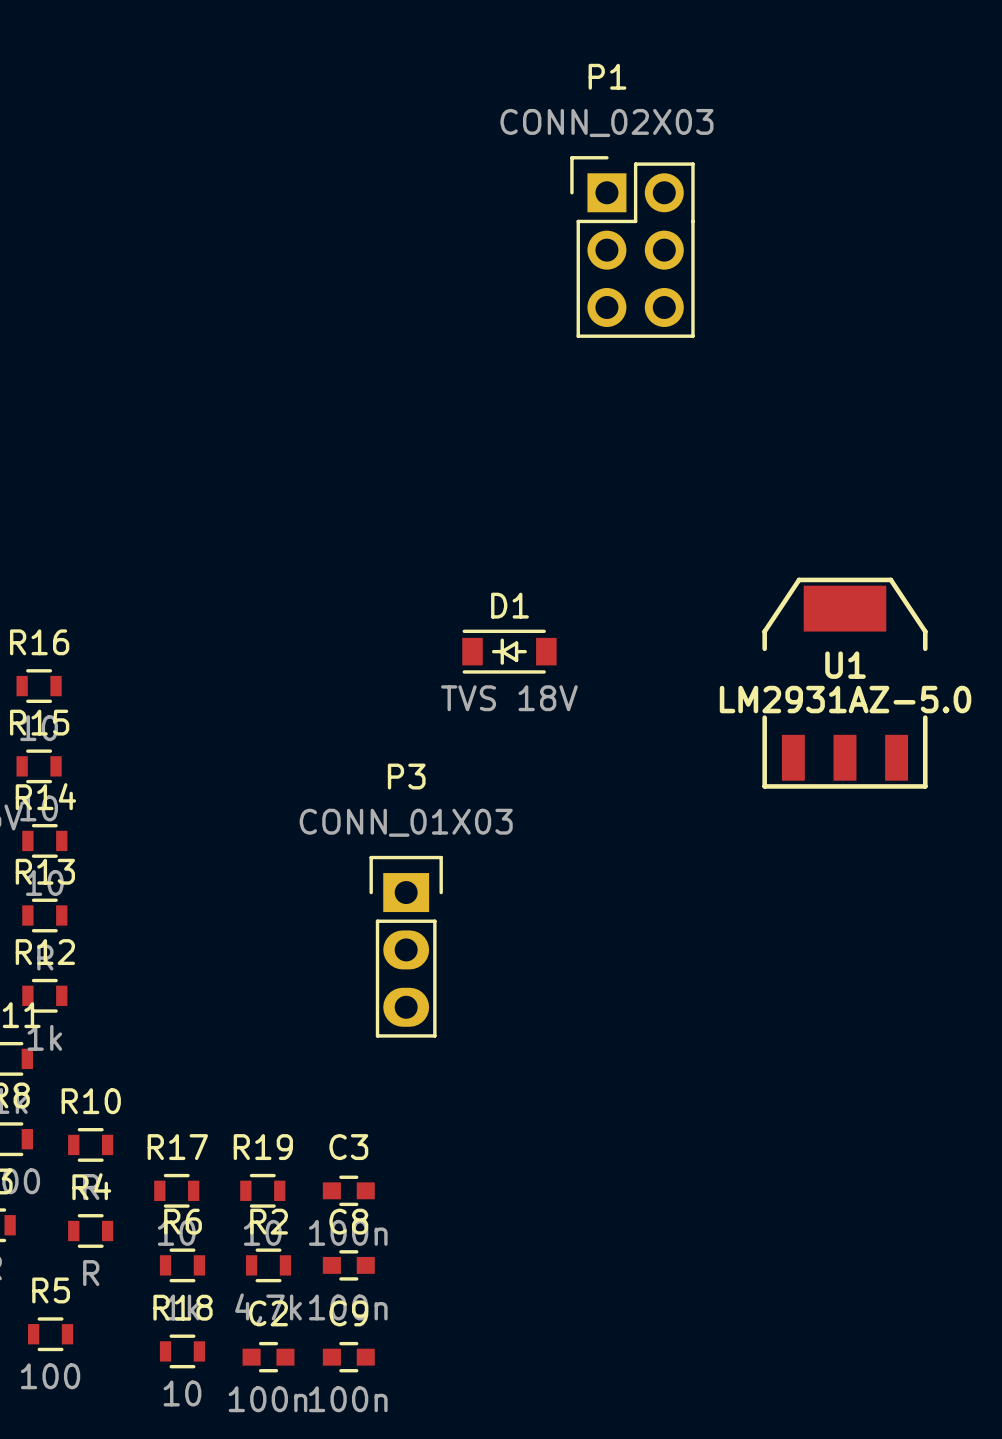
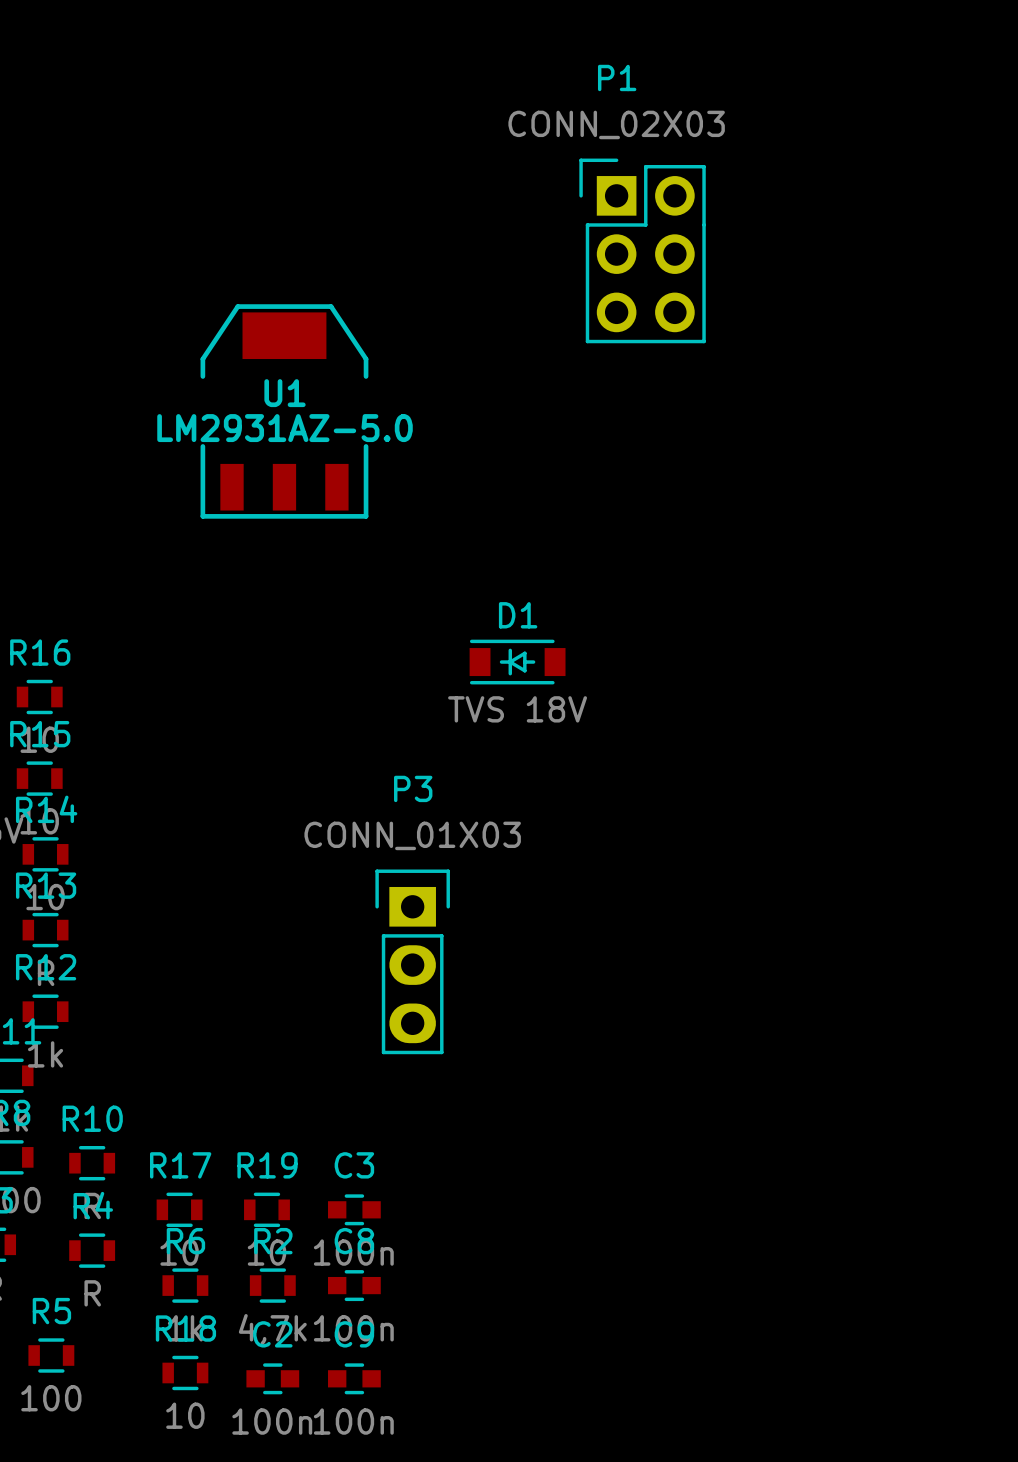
U1 position: (844, 683) -> (284, 411)

